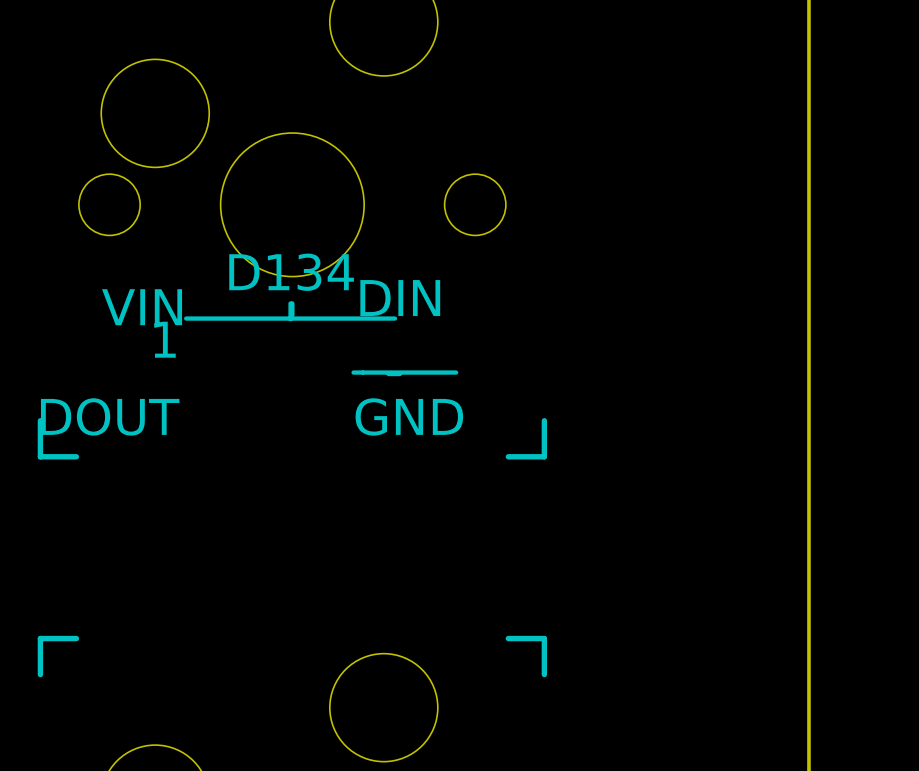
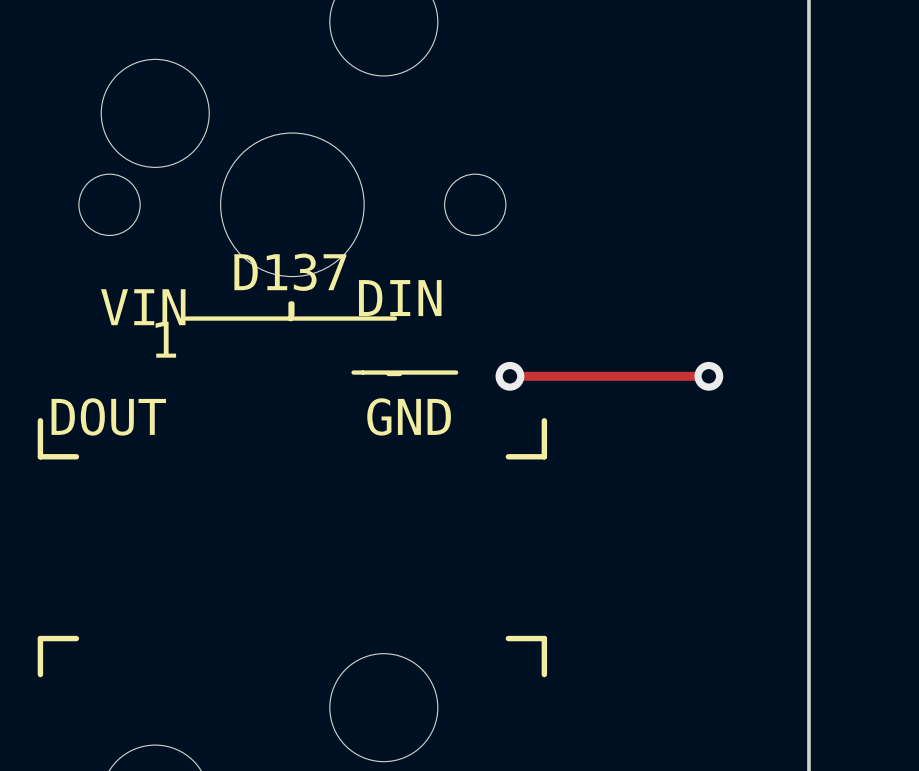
D134 name: D134 (291, 272) -> D137 (290, 272)
track: none -> (509, 376) (708, 376)
via: none -> (509, 376)
via: none -> (708, 376)

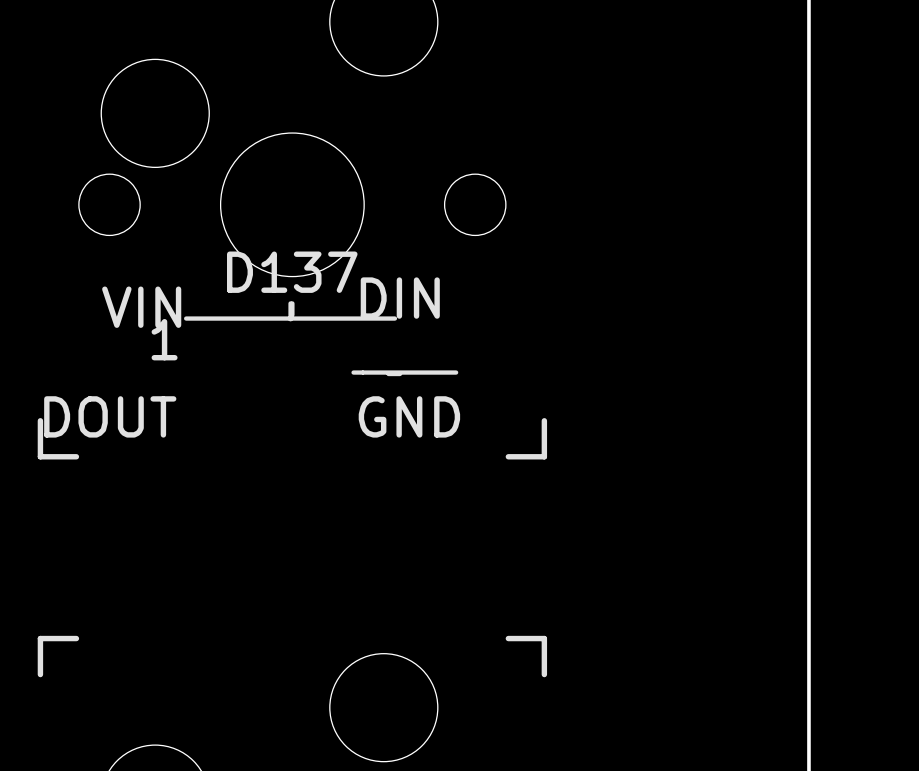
track: (509, 376) (708, 376) -> none
via: (509, 376) -> none
via: (708, 376) -> none

